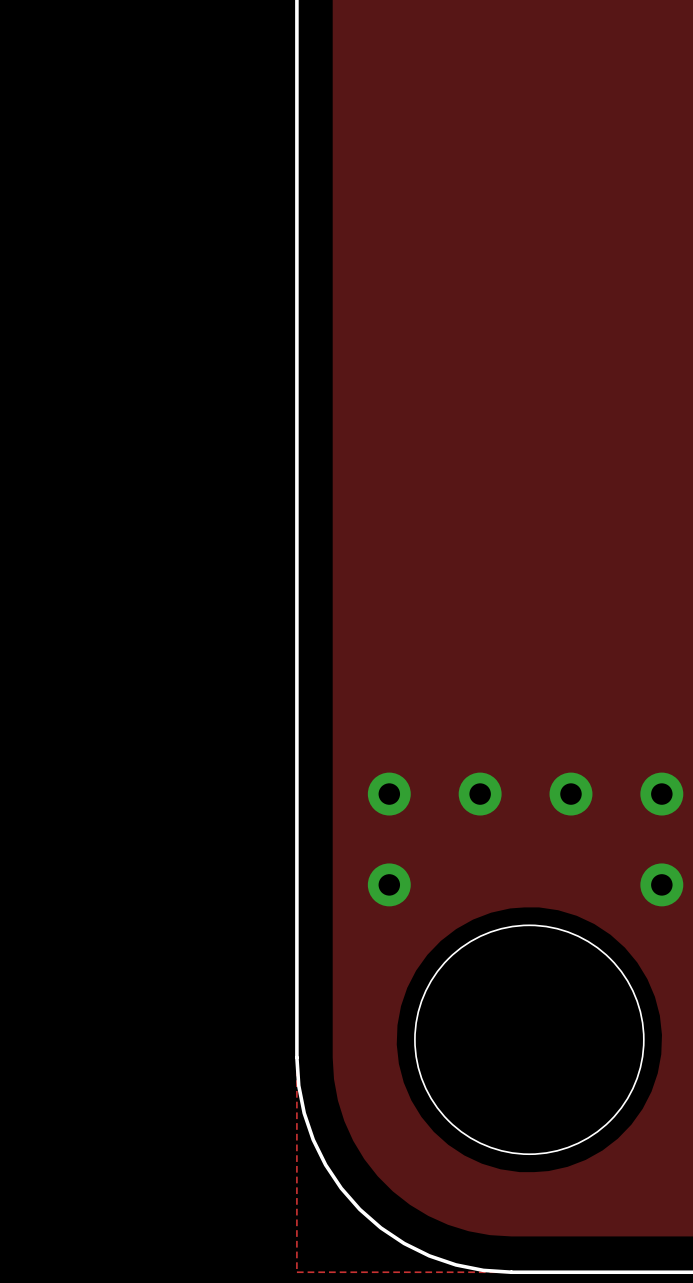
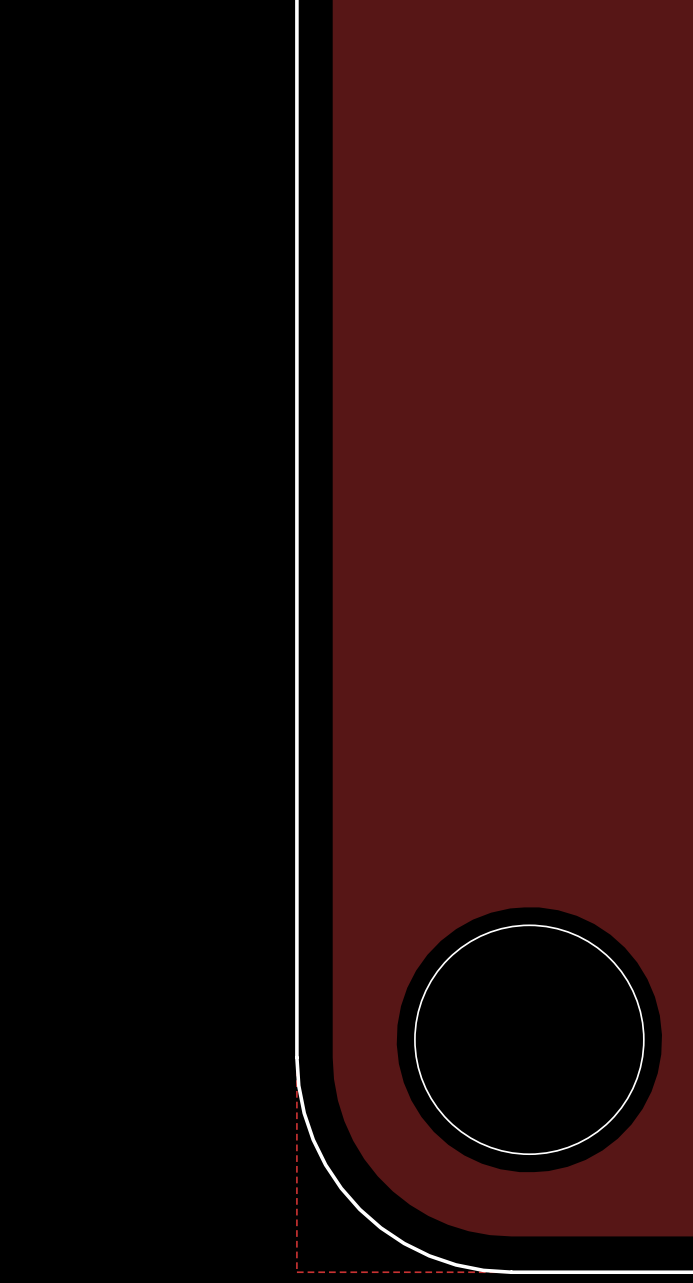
via: (389, 794) -> none
via: (480, 794) -> none
via: (570, 794) -> none
via: (661, 794) -> none
via: (389, 884) -> none
via: (661, 884) -> none

